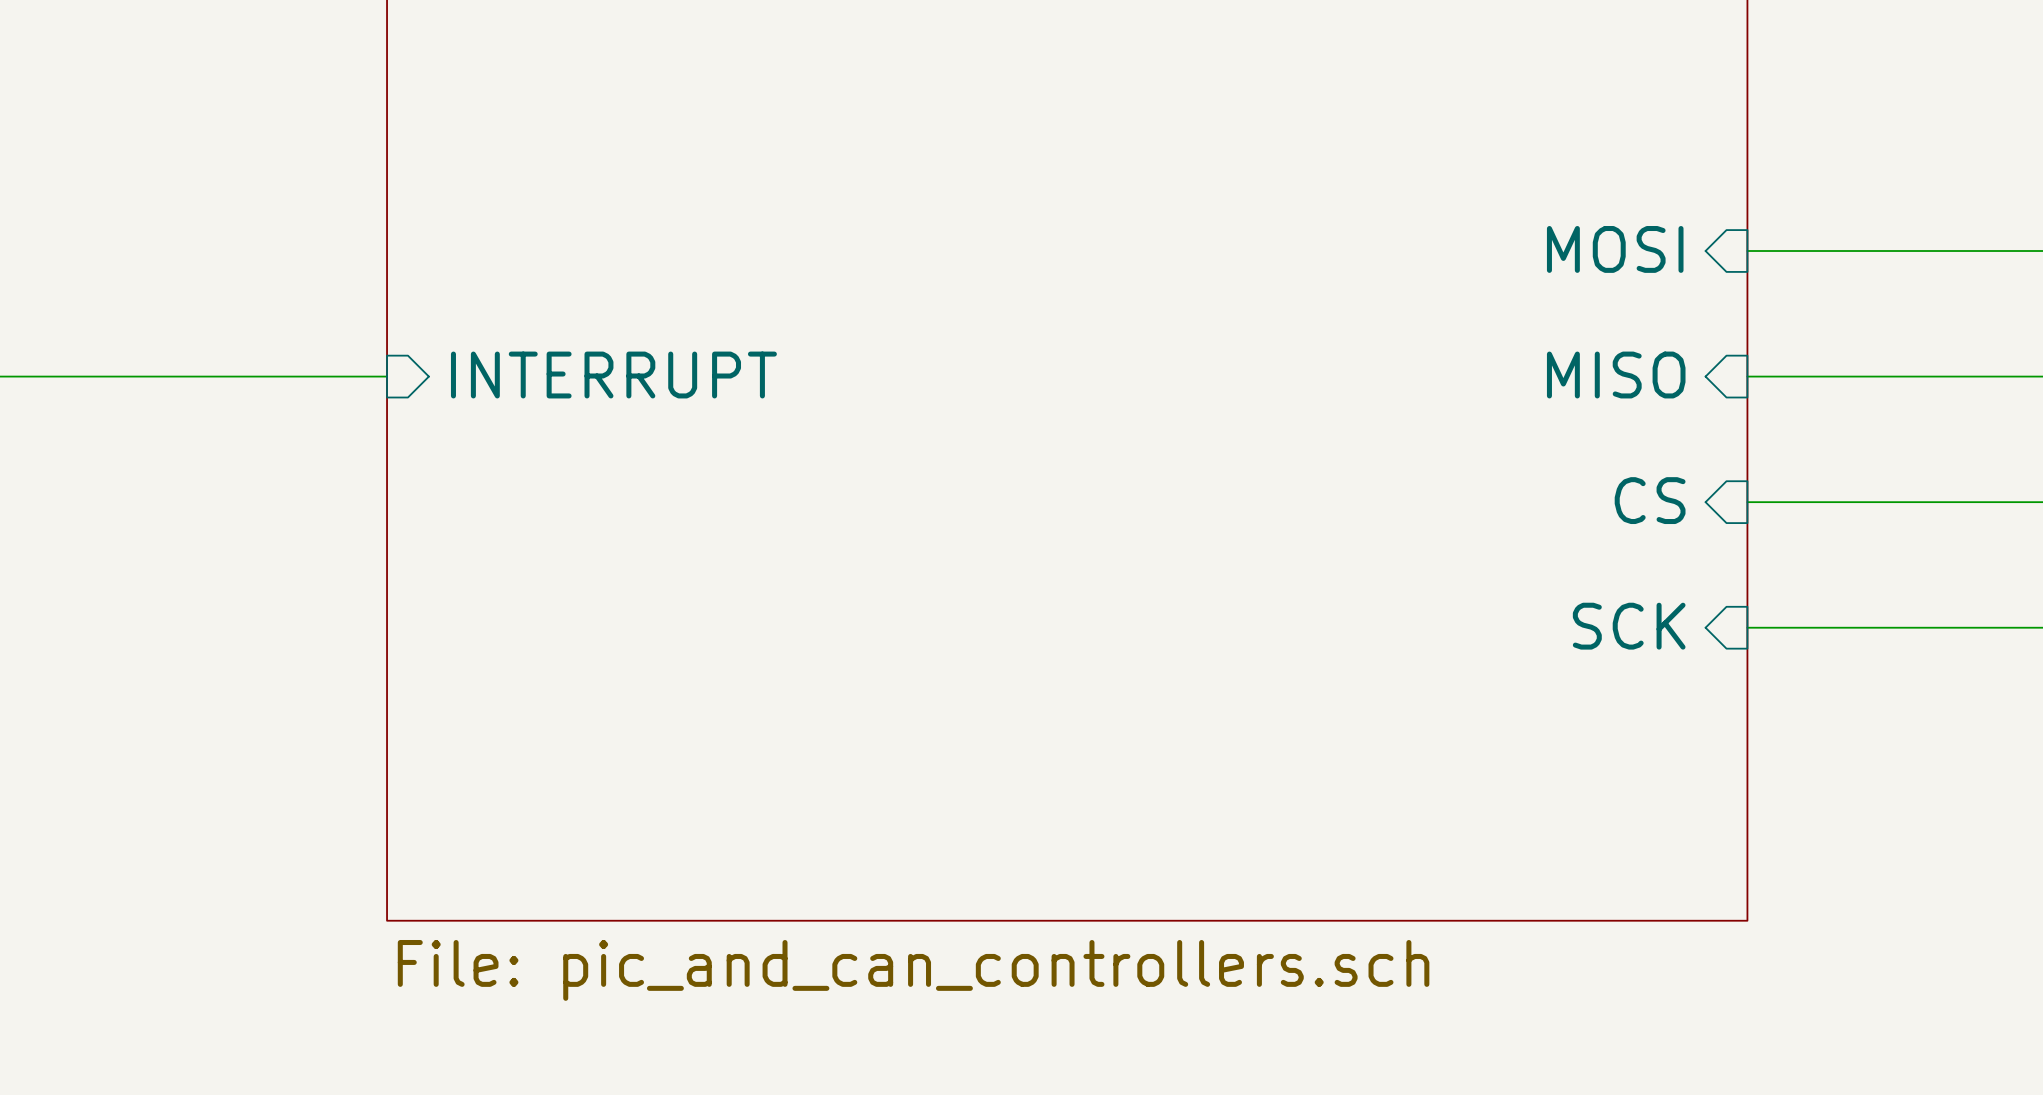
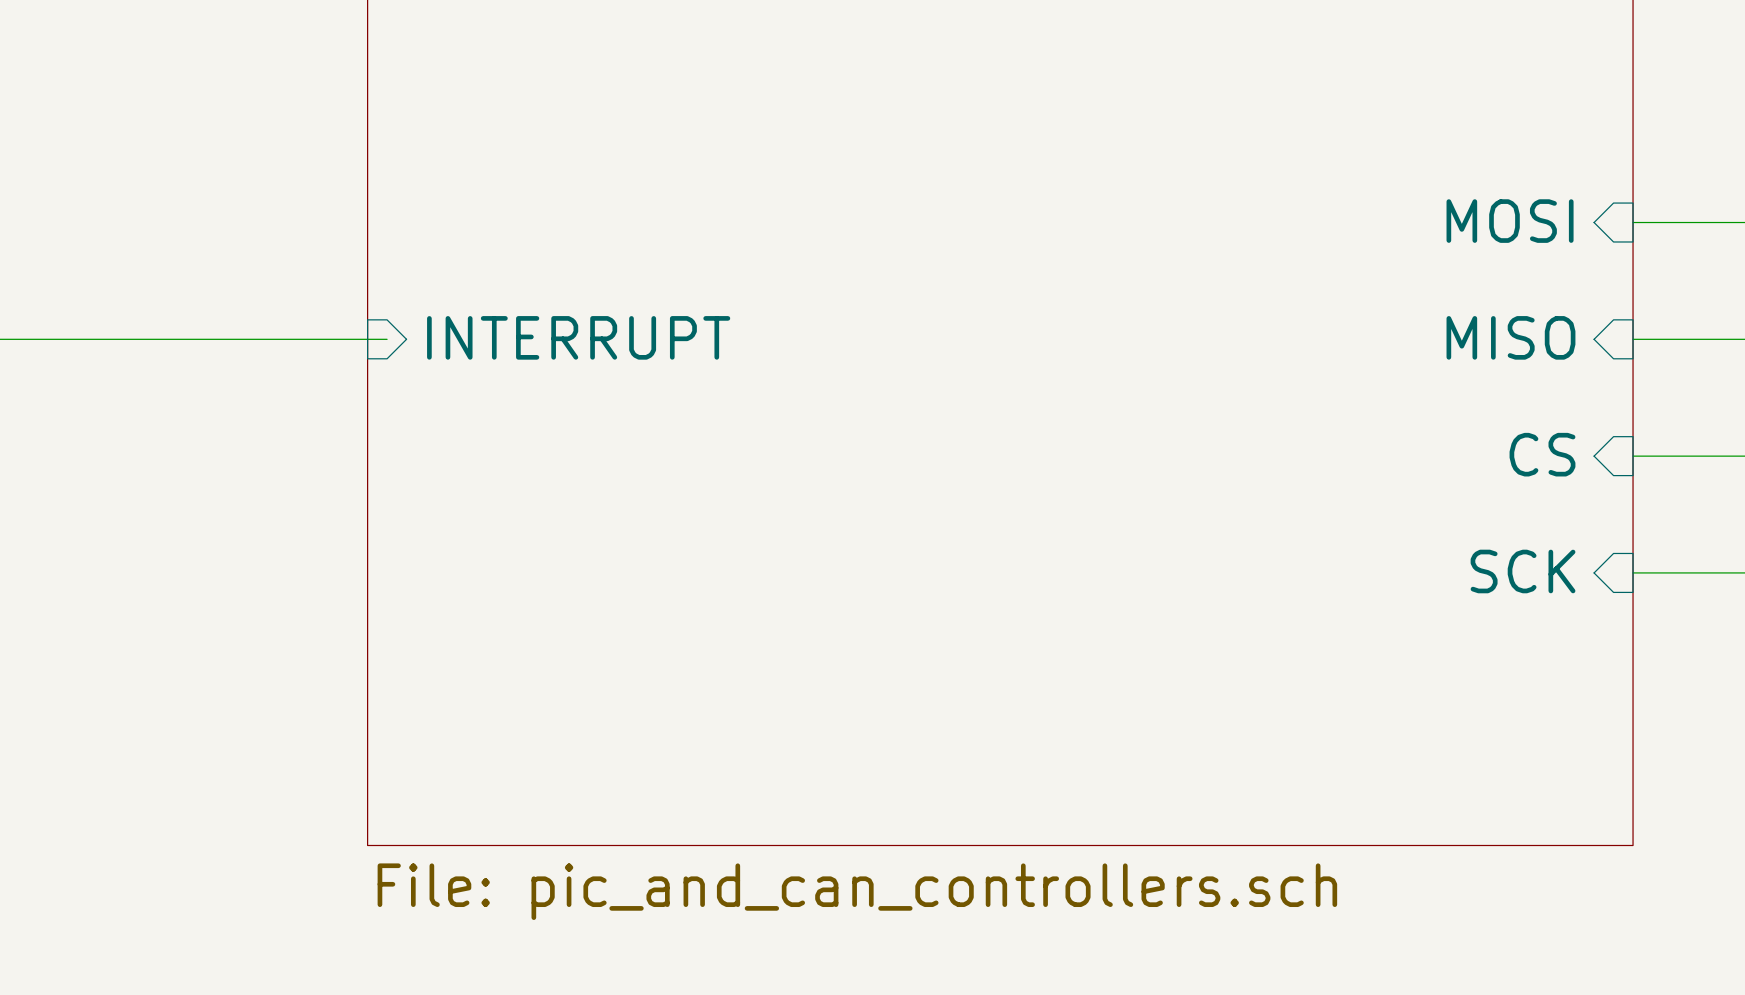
wire: none -> (367, 339) (387, 339)

